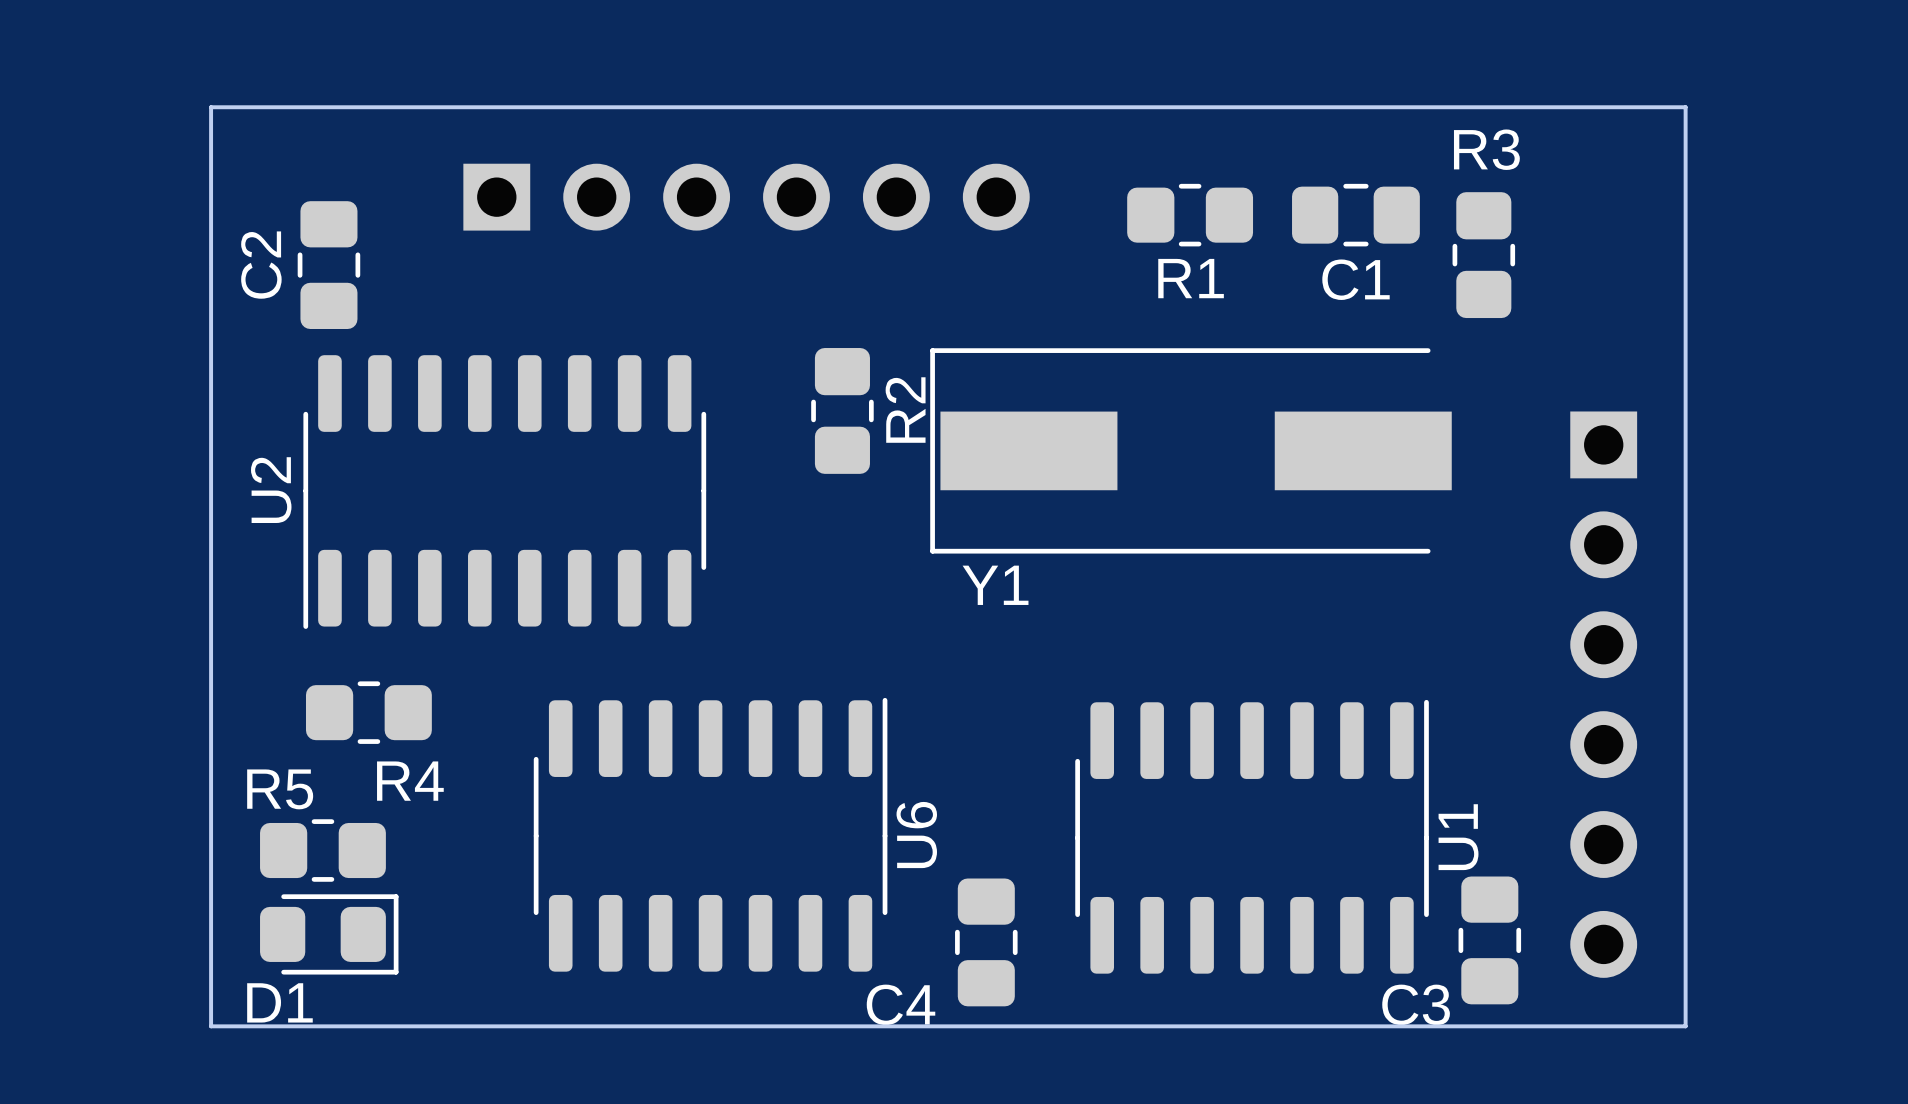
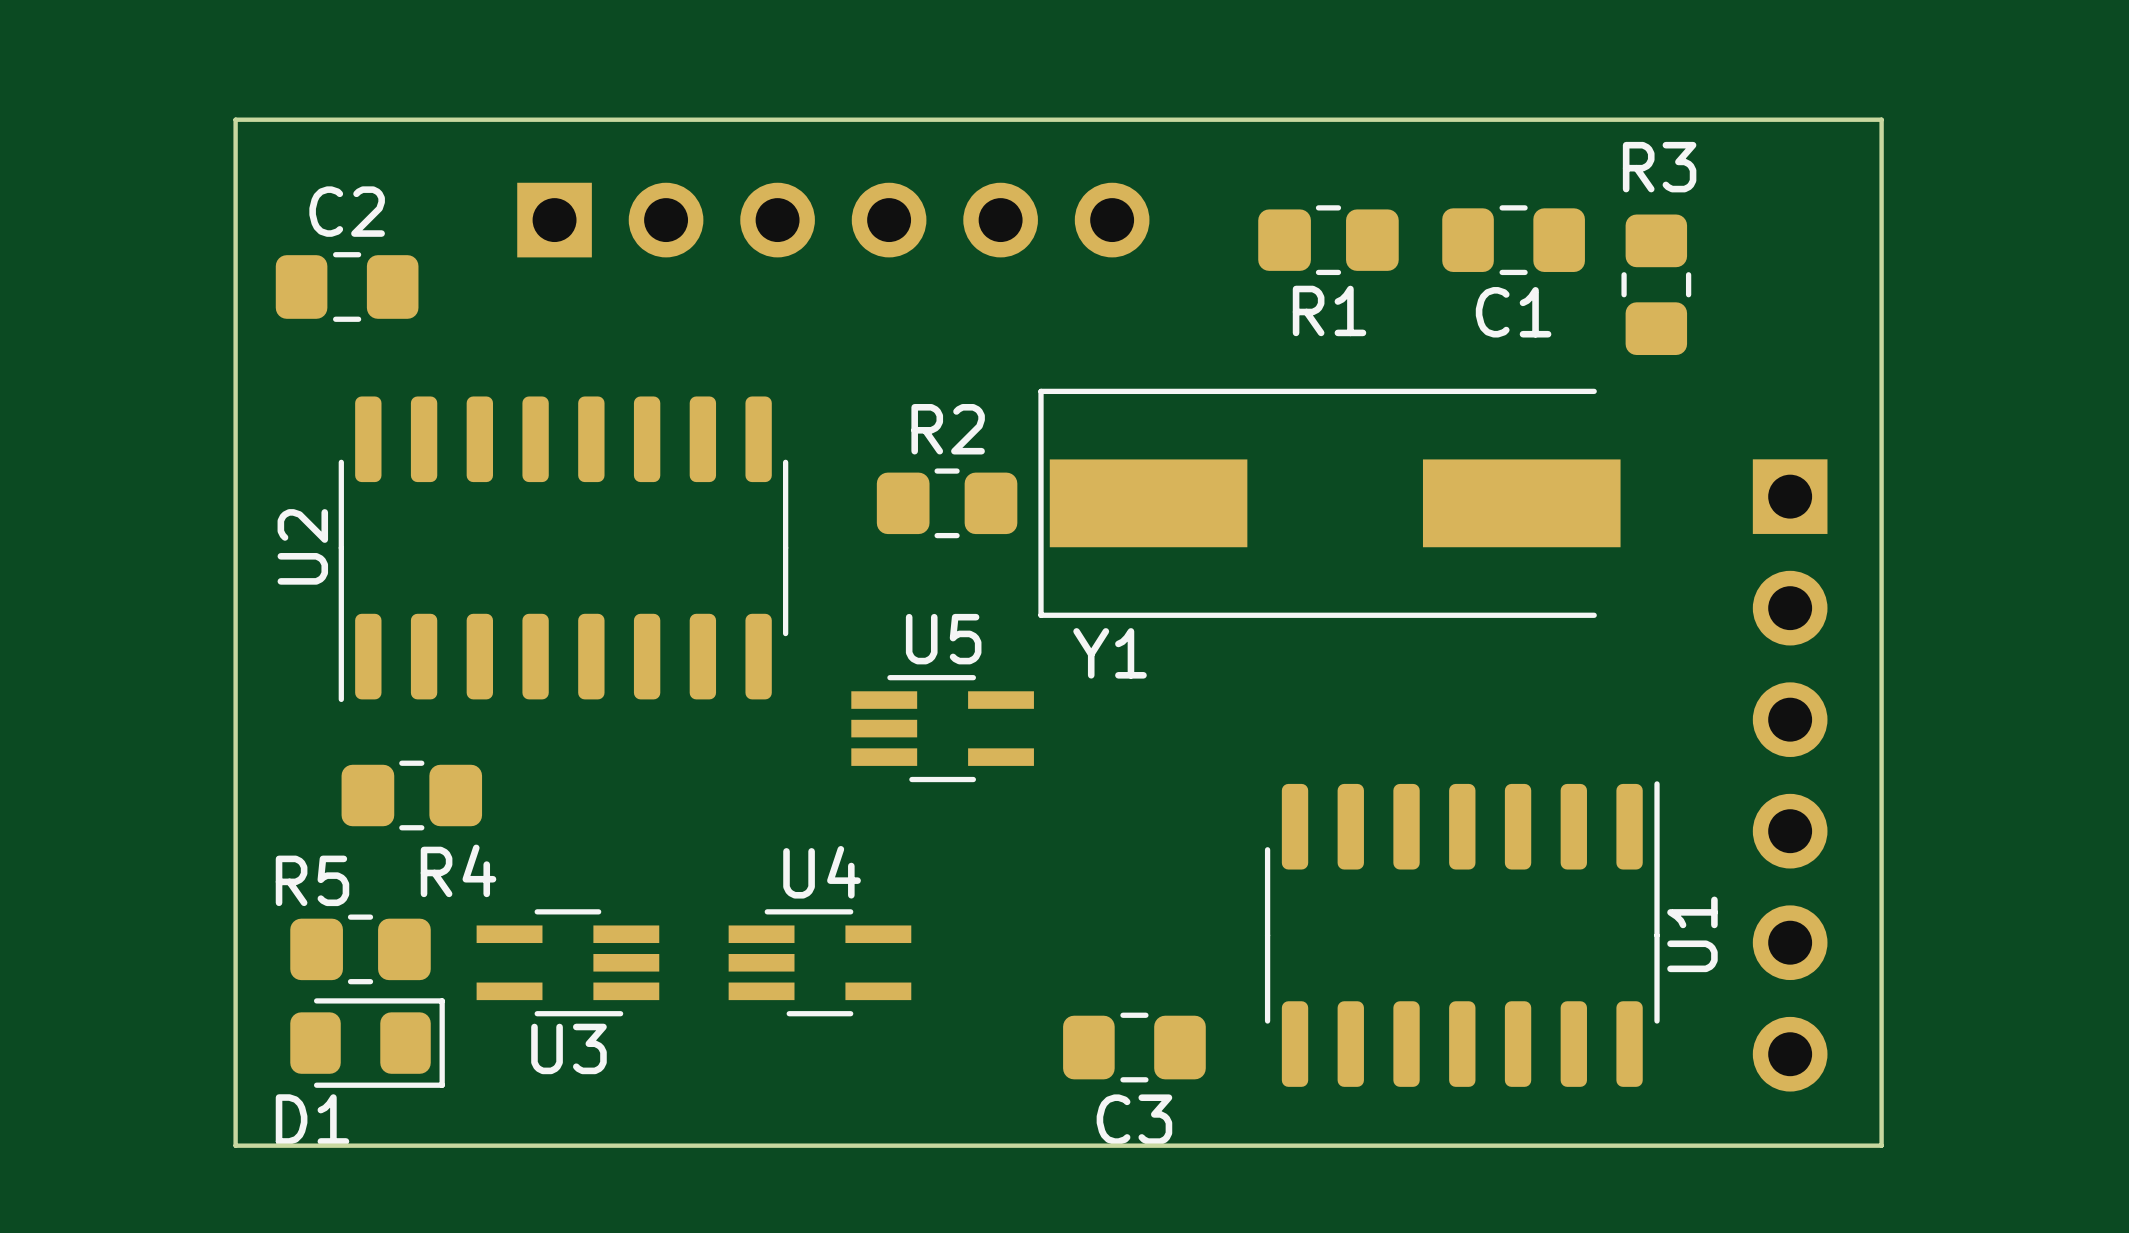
C2 rotation: 0° (328, 265) -> 90° clockwise (347, 286)
R2 rotation: 0° (842, 410) -> 90° clockwise (947, 503)
R2 name position: R2 (905, 410) -> R2 (948, 429)
U5: none -> (942, 728)
U6: (710, 834) -> none
U1 position: (1252, 836) -> (1462, 934)
U3: none -> (567, 962)
U4: none -> (819, 962)
C3 rotation: 0° (1489, 940) -> 90° clockwise (1134, 1047)
C3 position: (1489, 940) -> (1134, 1047)
C4: (986, 942) -> none

